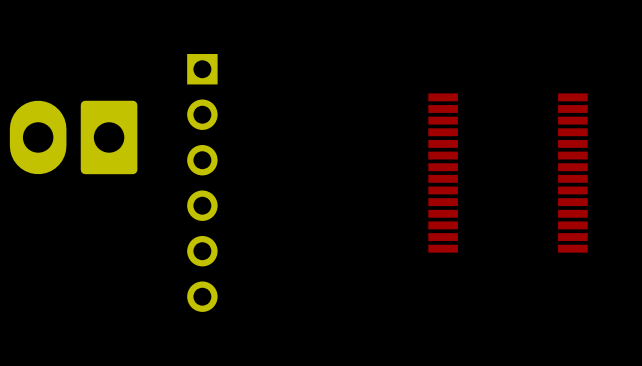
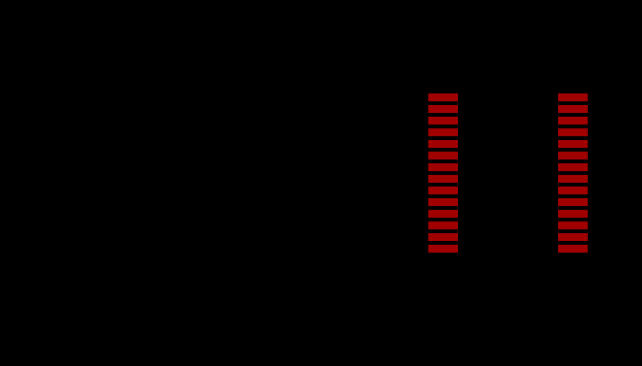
part: (73, 137) -> none
part: (202, 182) -> none

